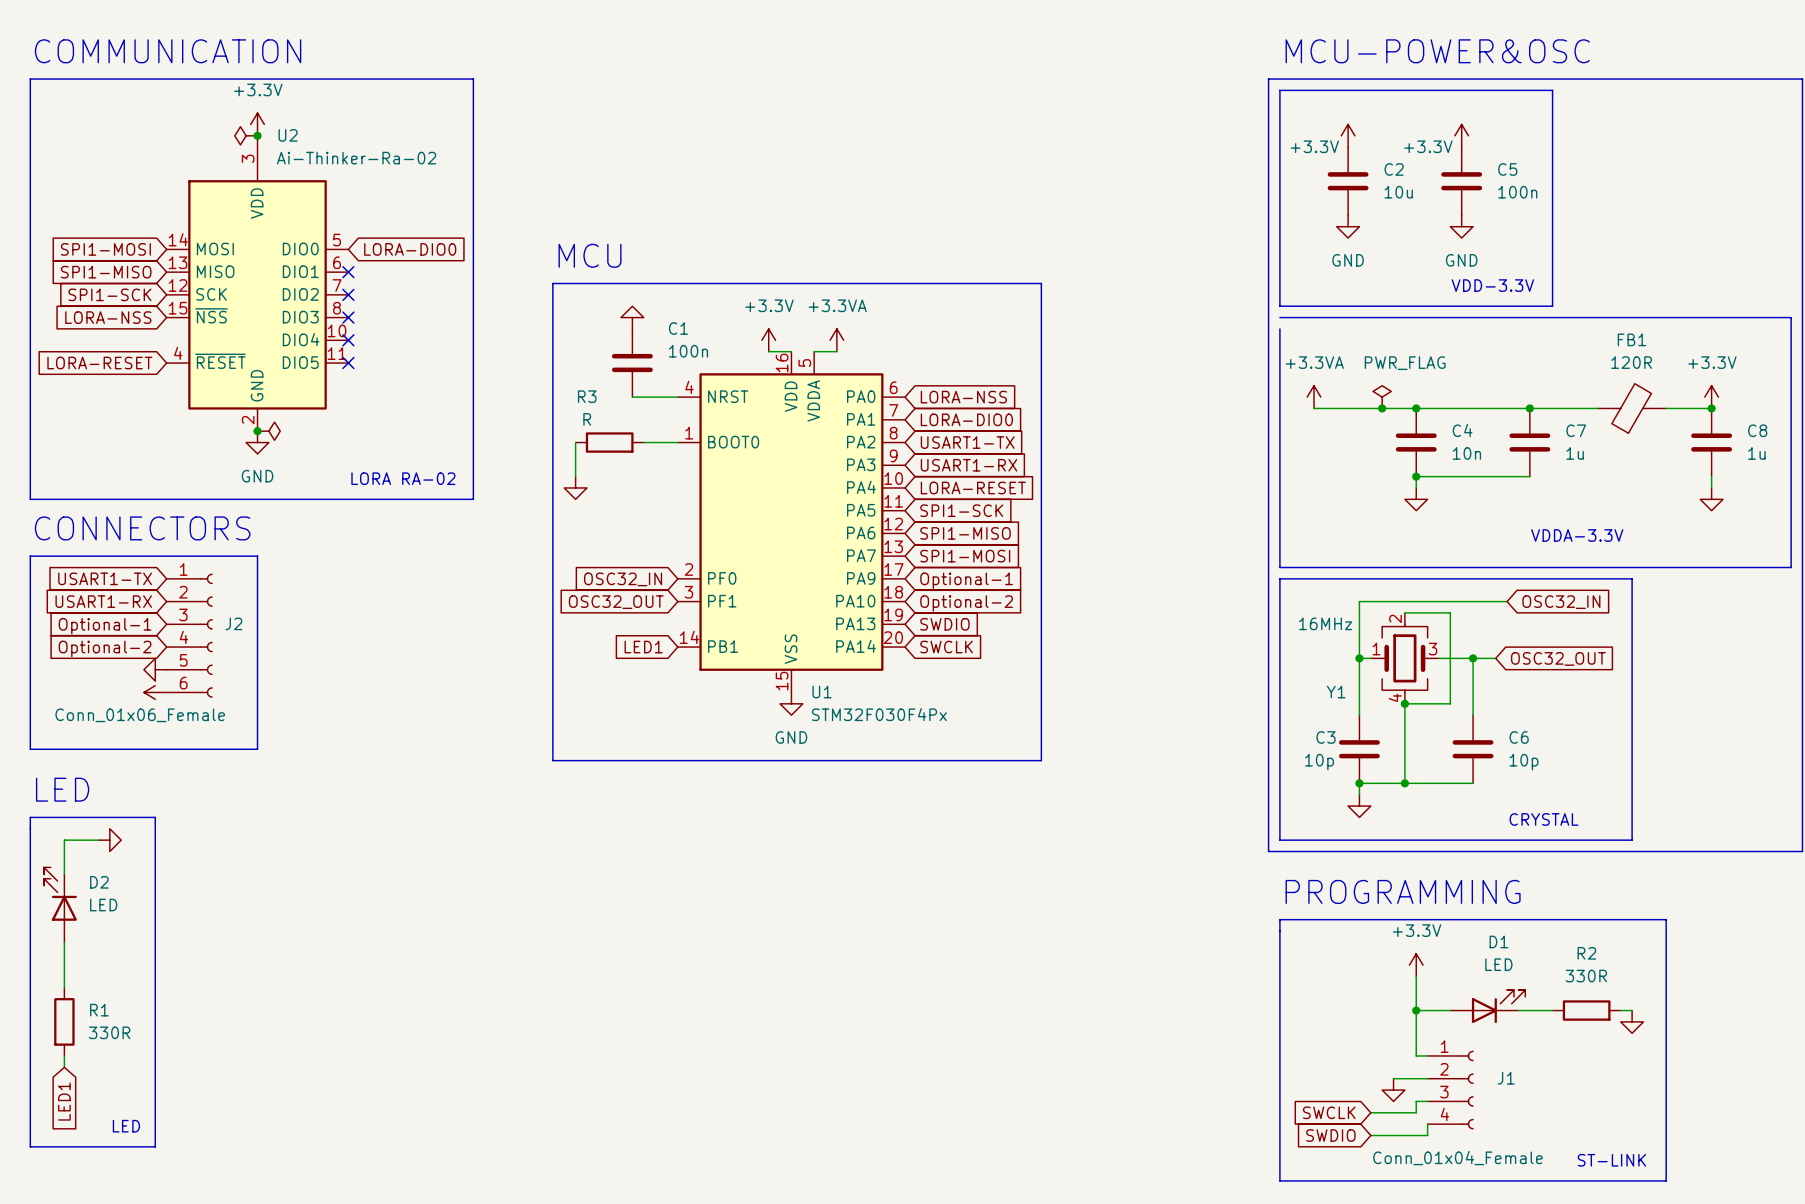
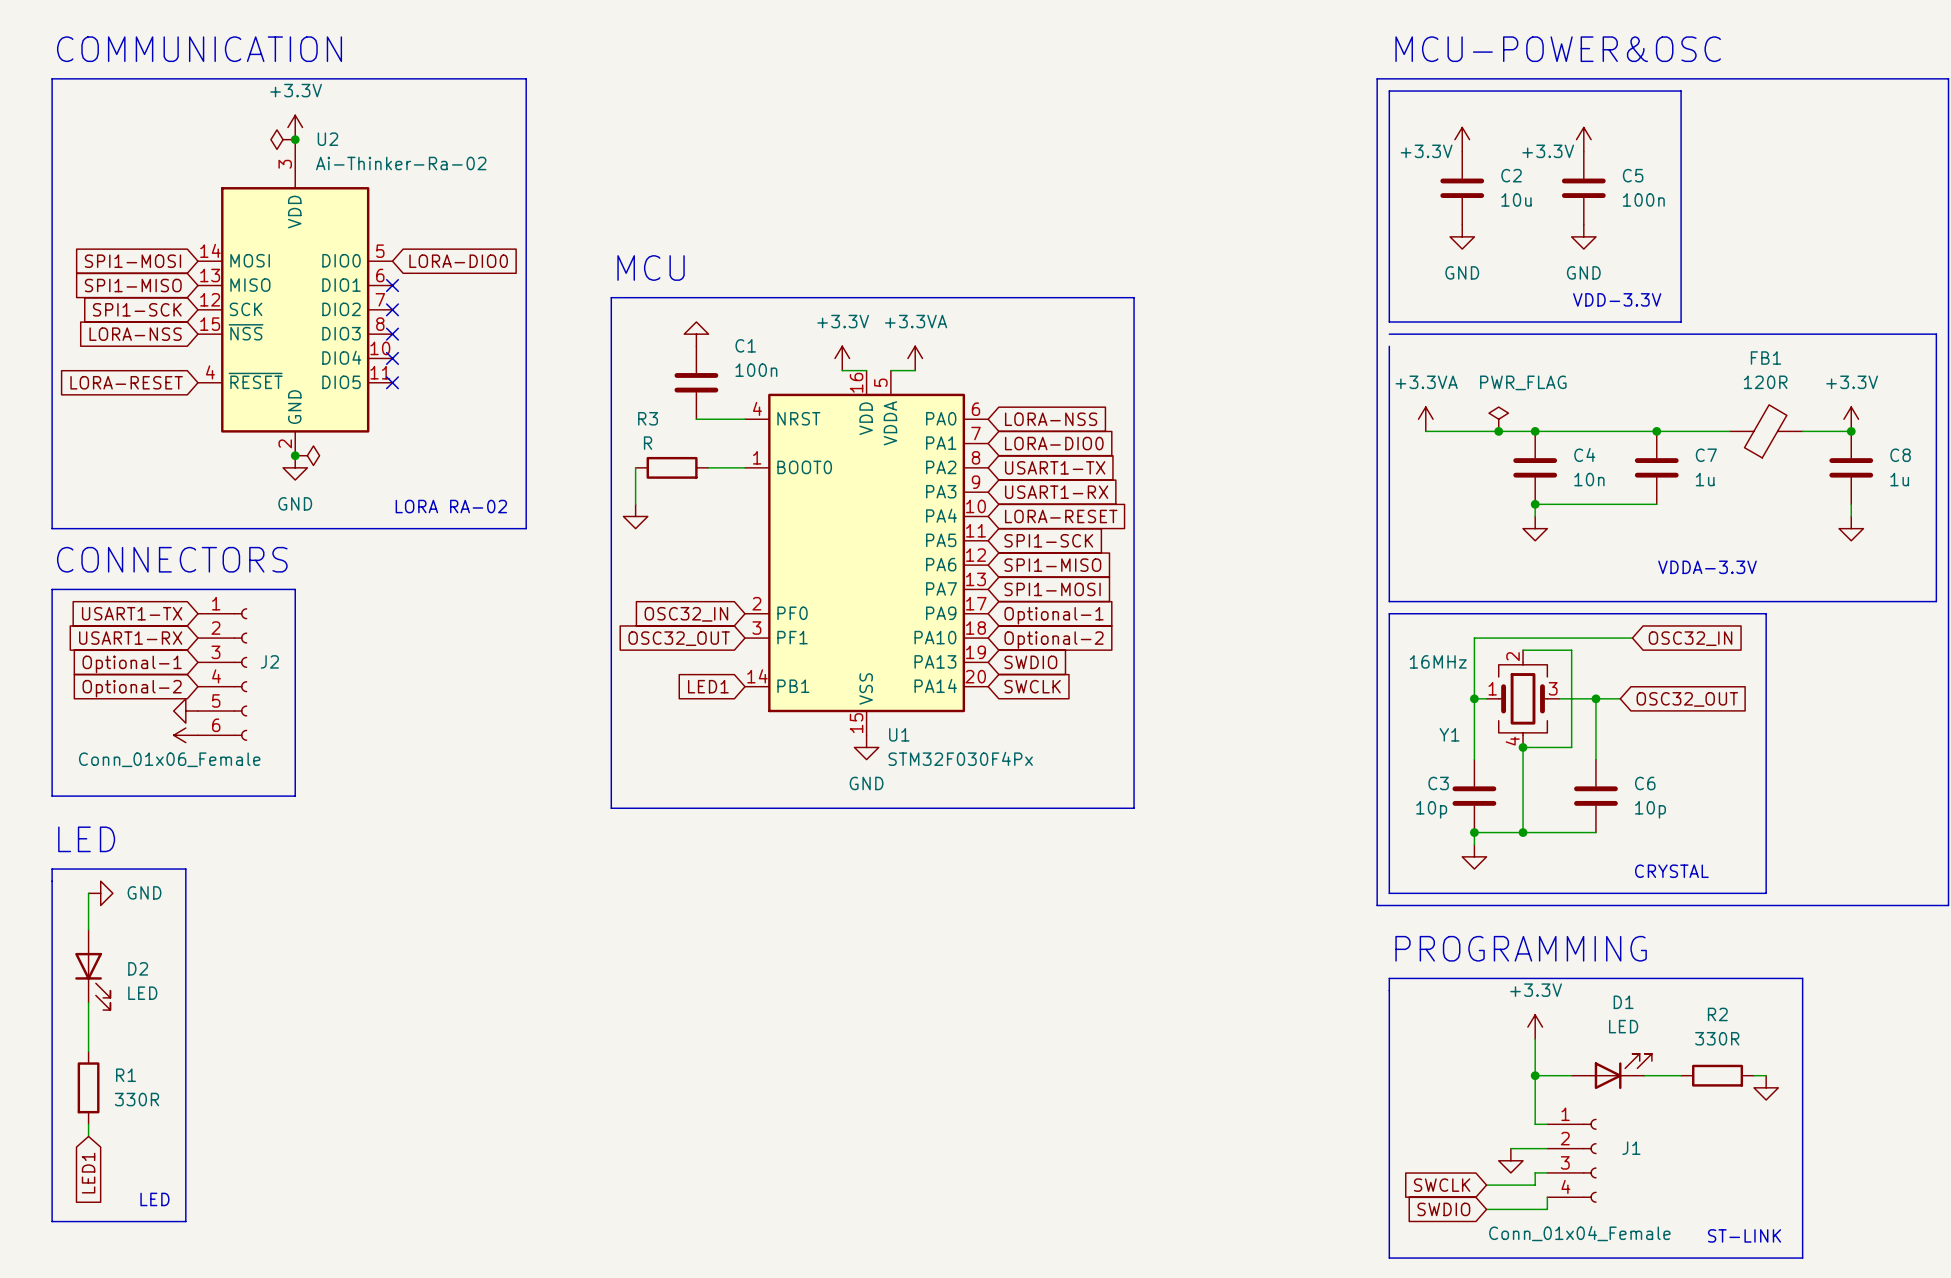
wire: (64, 840) (98, 840) -> none
power symbol: none -> GND (100, 893)
power symbol: (109, 840) -> none
D2 name position: D2 (99, 882) -> D2 (138, 968)
D2 rotation: 0° (60, 894) -> 180° (92, 981)
D2 value position: LED (103, 905) -> LED (142, 993)

